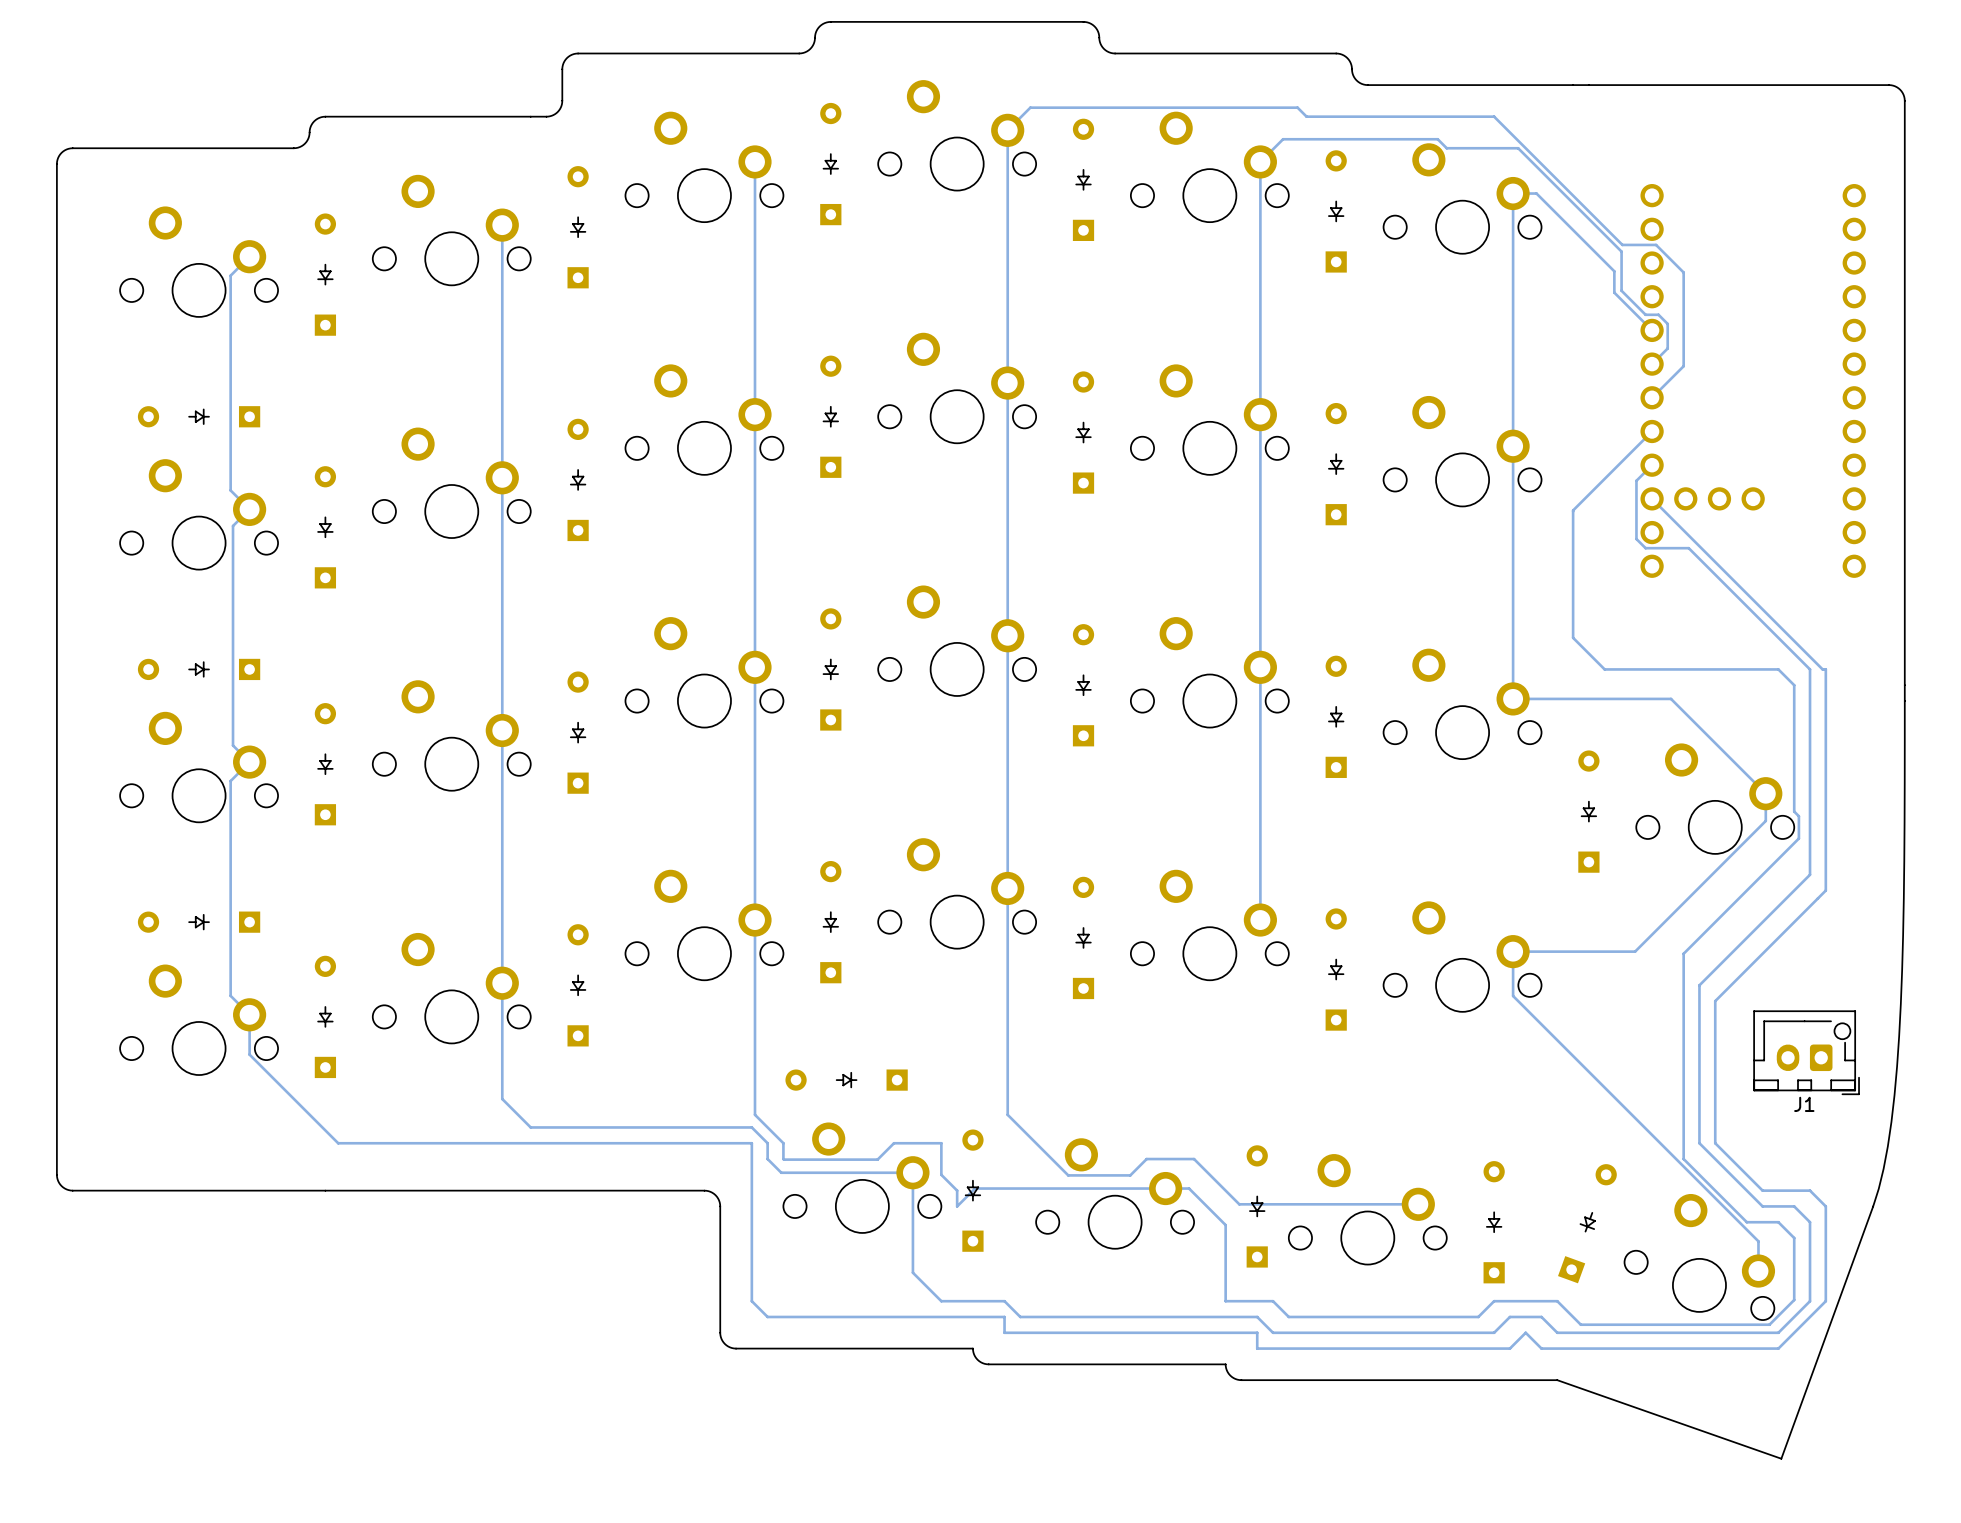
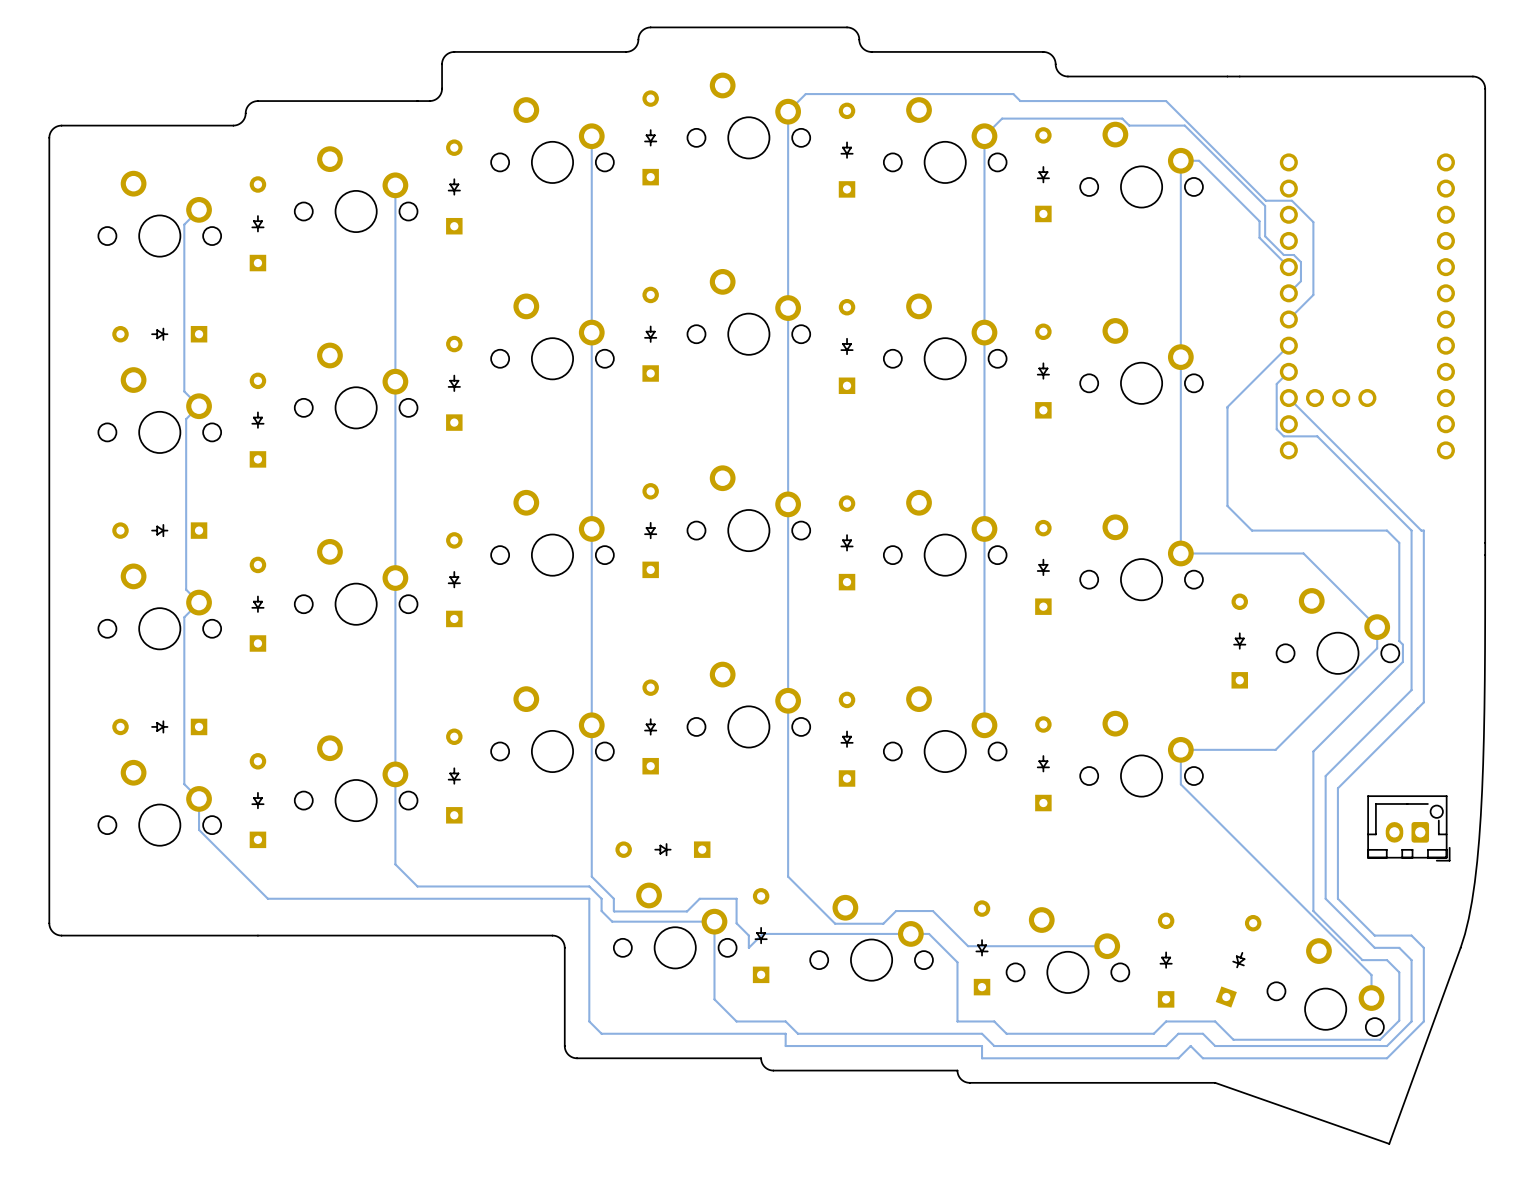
J1 name: J1 (1804, 1104) -> none

